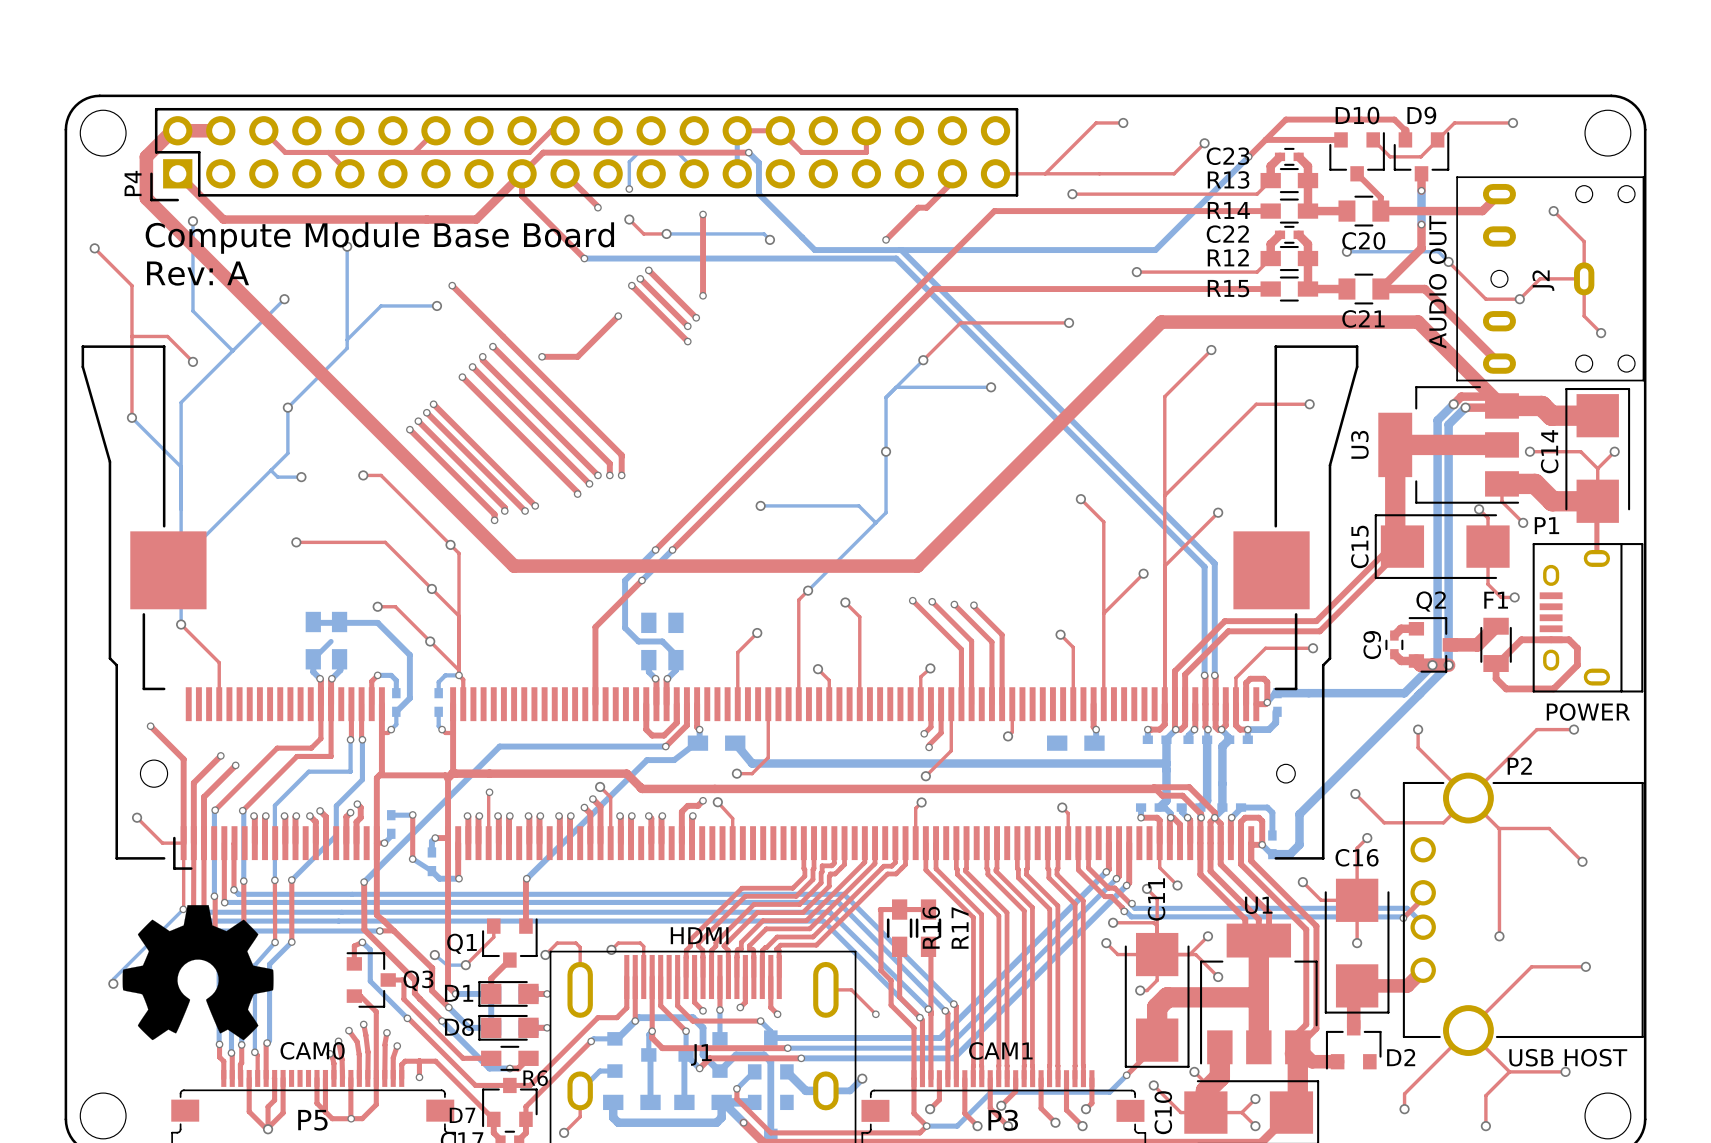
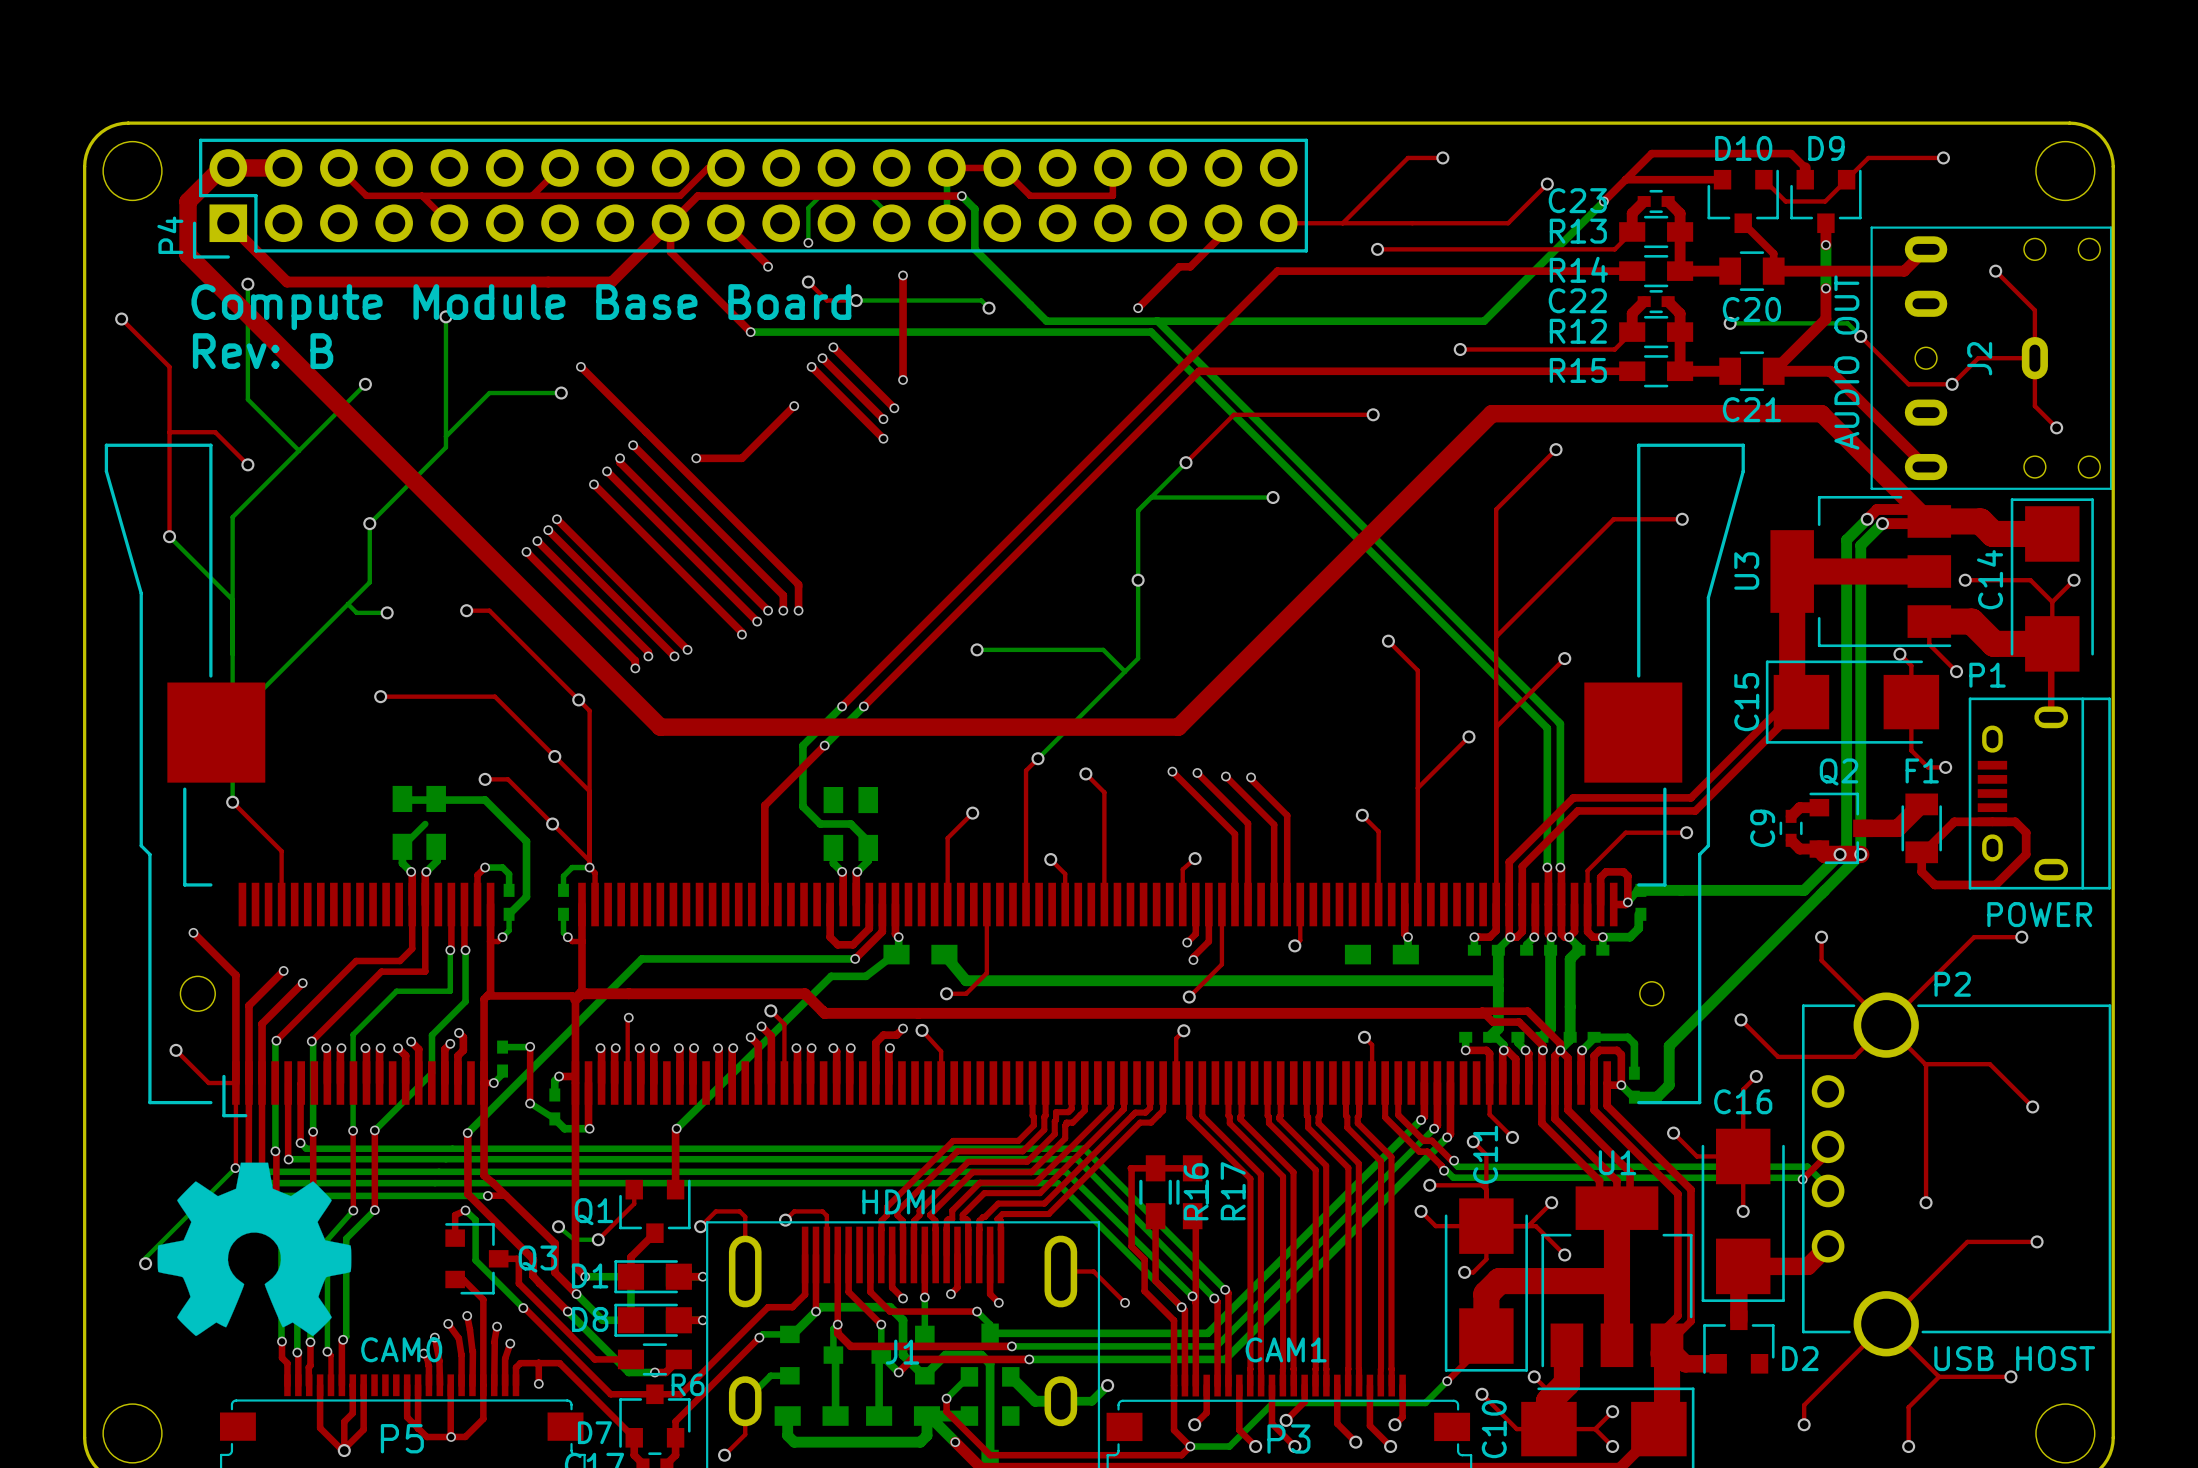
text: Rev: A (198, 273) -> Rev: B (263, 351)

